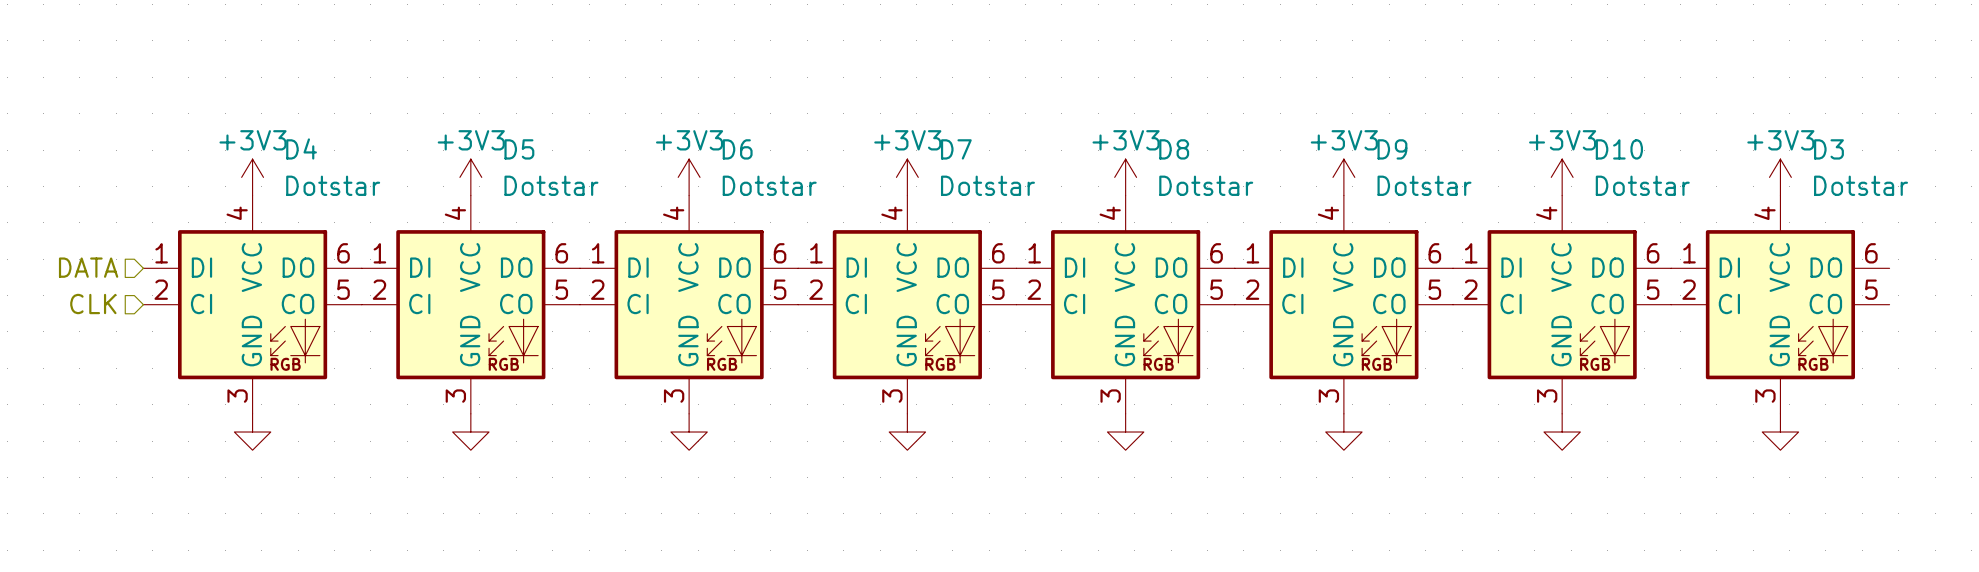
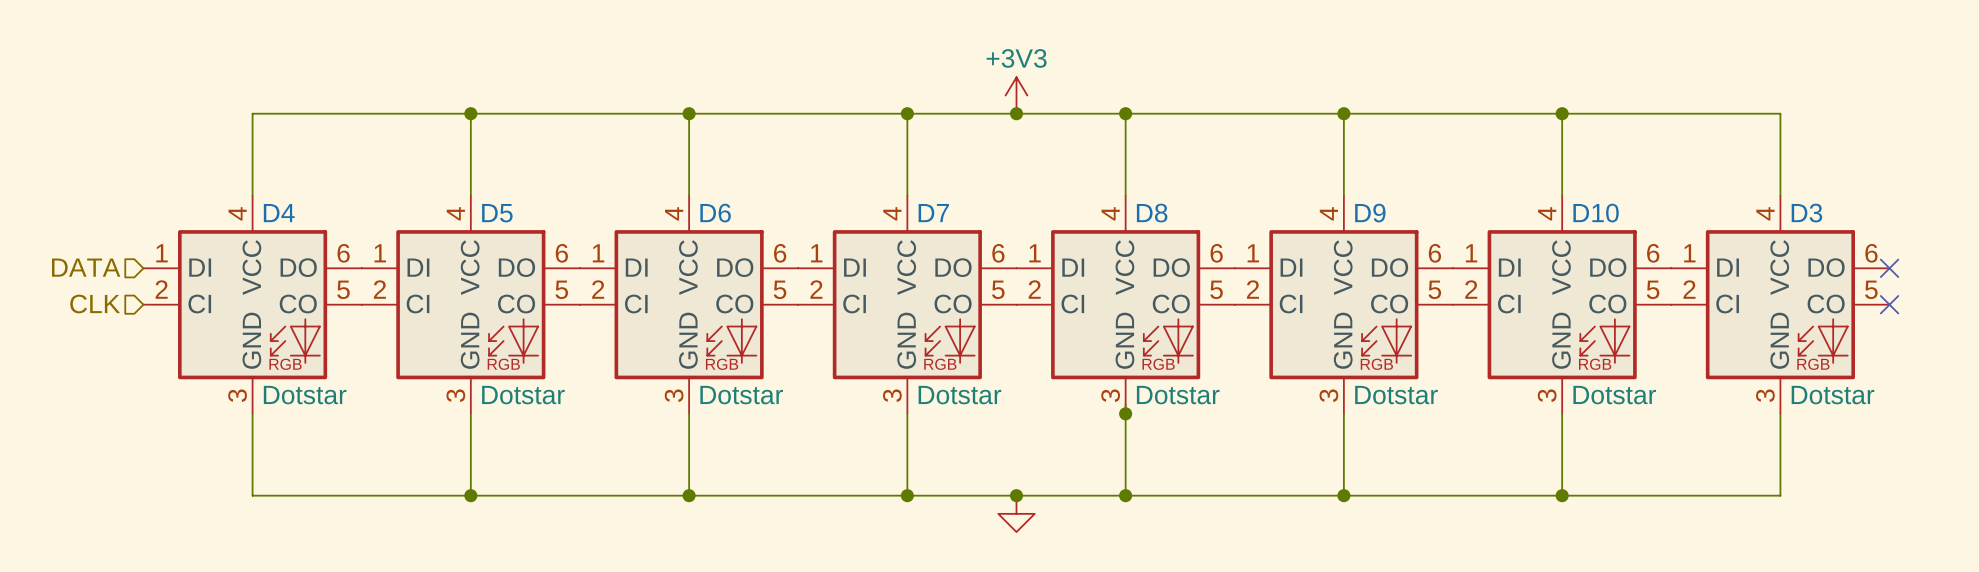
power symbol: none -> +3V3 (1016, 95)
wire: none -> (470, 113) (470, 195)
junction: none -> (470, 113)
wire: none -> (689, 113) (689, 195)
junction: none -> (689, 113)
wire: none -> (907, 113) (907, 195)
junction: none -> (907, 113)
junction: none -> (1016, 113)
wire: none -> (1125, 113) (1125, 195)
junction: none -> (1125, 113)
wire: none -> (1343, 113) (1343, 195)
junction: none -> (1343, 113)
wire: none -> (1562, 113) (1562, 195)
junction: none -> (1562, 113)
D4 name position: D4 (301, 148) -> D4 (279, 213)
D5 name position: D5 (519, 149) -> D5 (497, 213)
D6 name position: D6 (737, 149) -> D6 (715, 213)
D7 name position: D7 (956, 149) -> D7 (933, 213)
D8 name position: D8 (1174, 149) -> D8 (1152, 213)
D9 name position: D9 (1392, 149) -> D9 (1370, 213)
D10 name position: D10 (1619, 149) -> D10 (1596, 213)
D3 name position: D3 (1828, 149) -> D3 (1806, 213)
power symbol: +3V3 (252, 177) -> none
power symbol: +3V3 (470, 177) -> none
power symbol: +3V3 (689, 177) -> none
power symbol: +3V3 (907, 177) -> none
power symbol: +3V3 (1125, 177) -> none
power symbol: +3V3 (1343, 177) -> none
power symbol: +3V3 (1562, 177) -> none
power symbol: +3V3 (1780, 177) -> none
D4 value position: Dotstar (333, 185) -> Dotstar (305, 395)
D5 value position: Dotstar (551, 185) -> Dotstar (523, 395)
D6 value position: Dotstar (769, 185) -> Dotstar (741, 395)
D7 value position: Dotstar (987, 185) -> Dotstar (959, 395)
D8 value position: Dotstar (1206, 185) -> Dotstar (1178, 395)
D9 value position: Dotstar (1424, 185) -> Dotstar (1396, 395)
D10 value position: Dotstar (1642, 185) -> Dotstar (1614, 395)
D3 value position: Dotstar (1861, 185) -> Dotstar (1832, 395)
wire: none -> (252, 195) (252, 113) (1780, 113) (1780, 195)
no-connect mark: none -> (1889, 268)
no-connect mark: none -> (1889, 304)
wire: none -> (1125, 404) (1125, 495)
wire: none -> (252, 413) (252, 495) (1780, 495) (1780, 413)
wire: none -> (470, 413) (470, 495)
wire: none -> (689, 413) (689, 495)
wire: none -> (907, 413) (907, 495)
junction: none -> (1125, 413)
wire: none -> (1343, 413) (1343, 495)
wire: none -> (1562, 413) (1562, 495)
power symbol: (252, 432) -> none
power symbol: (470, 432) -> none
power symbol: (689, 432) -> none
power symbol: (907, 432) -> none
power symbol: (1125, 432) -> none
power symbol: (1343, 432) -> none
power symbol: (1562, 432) -> none
power symbol: (1780, 432) -> none
junction: none -> (470, 495)
junction: none -> (689, 495)
junction: none -> (907, 495)
junction: none -> (1016, 495)
junction: none -> (1125, 495)
junction: none -> (1343, 495)
junction: none -> (1562, 495)
power symbol: none -> (1016, 513)

